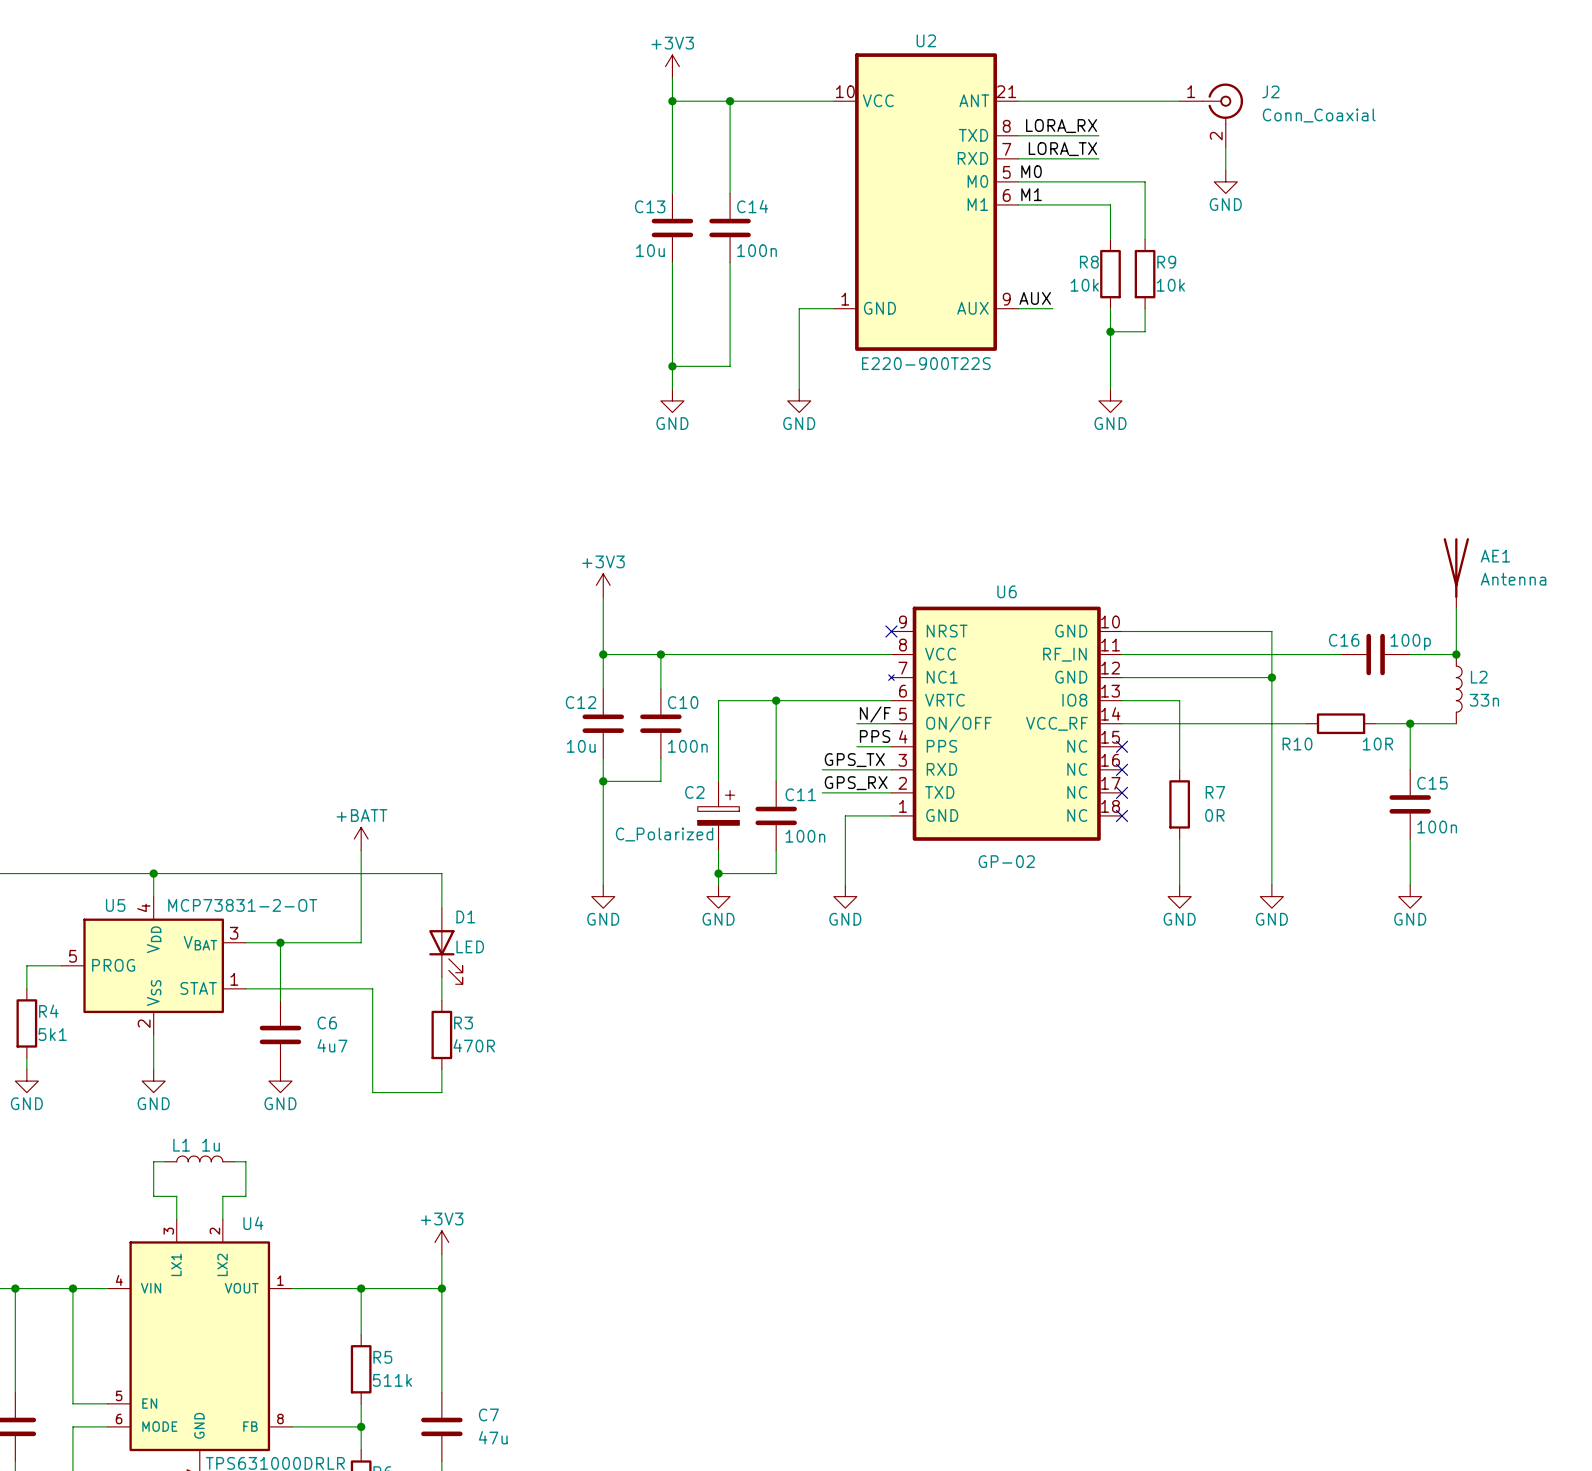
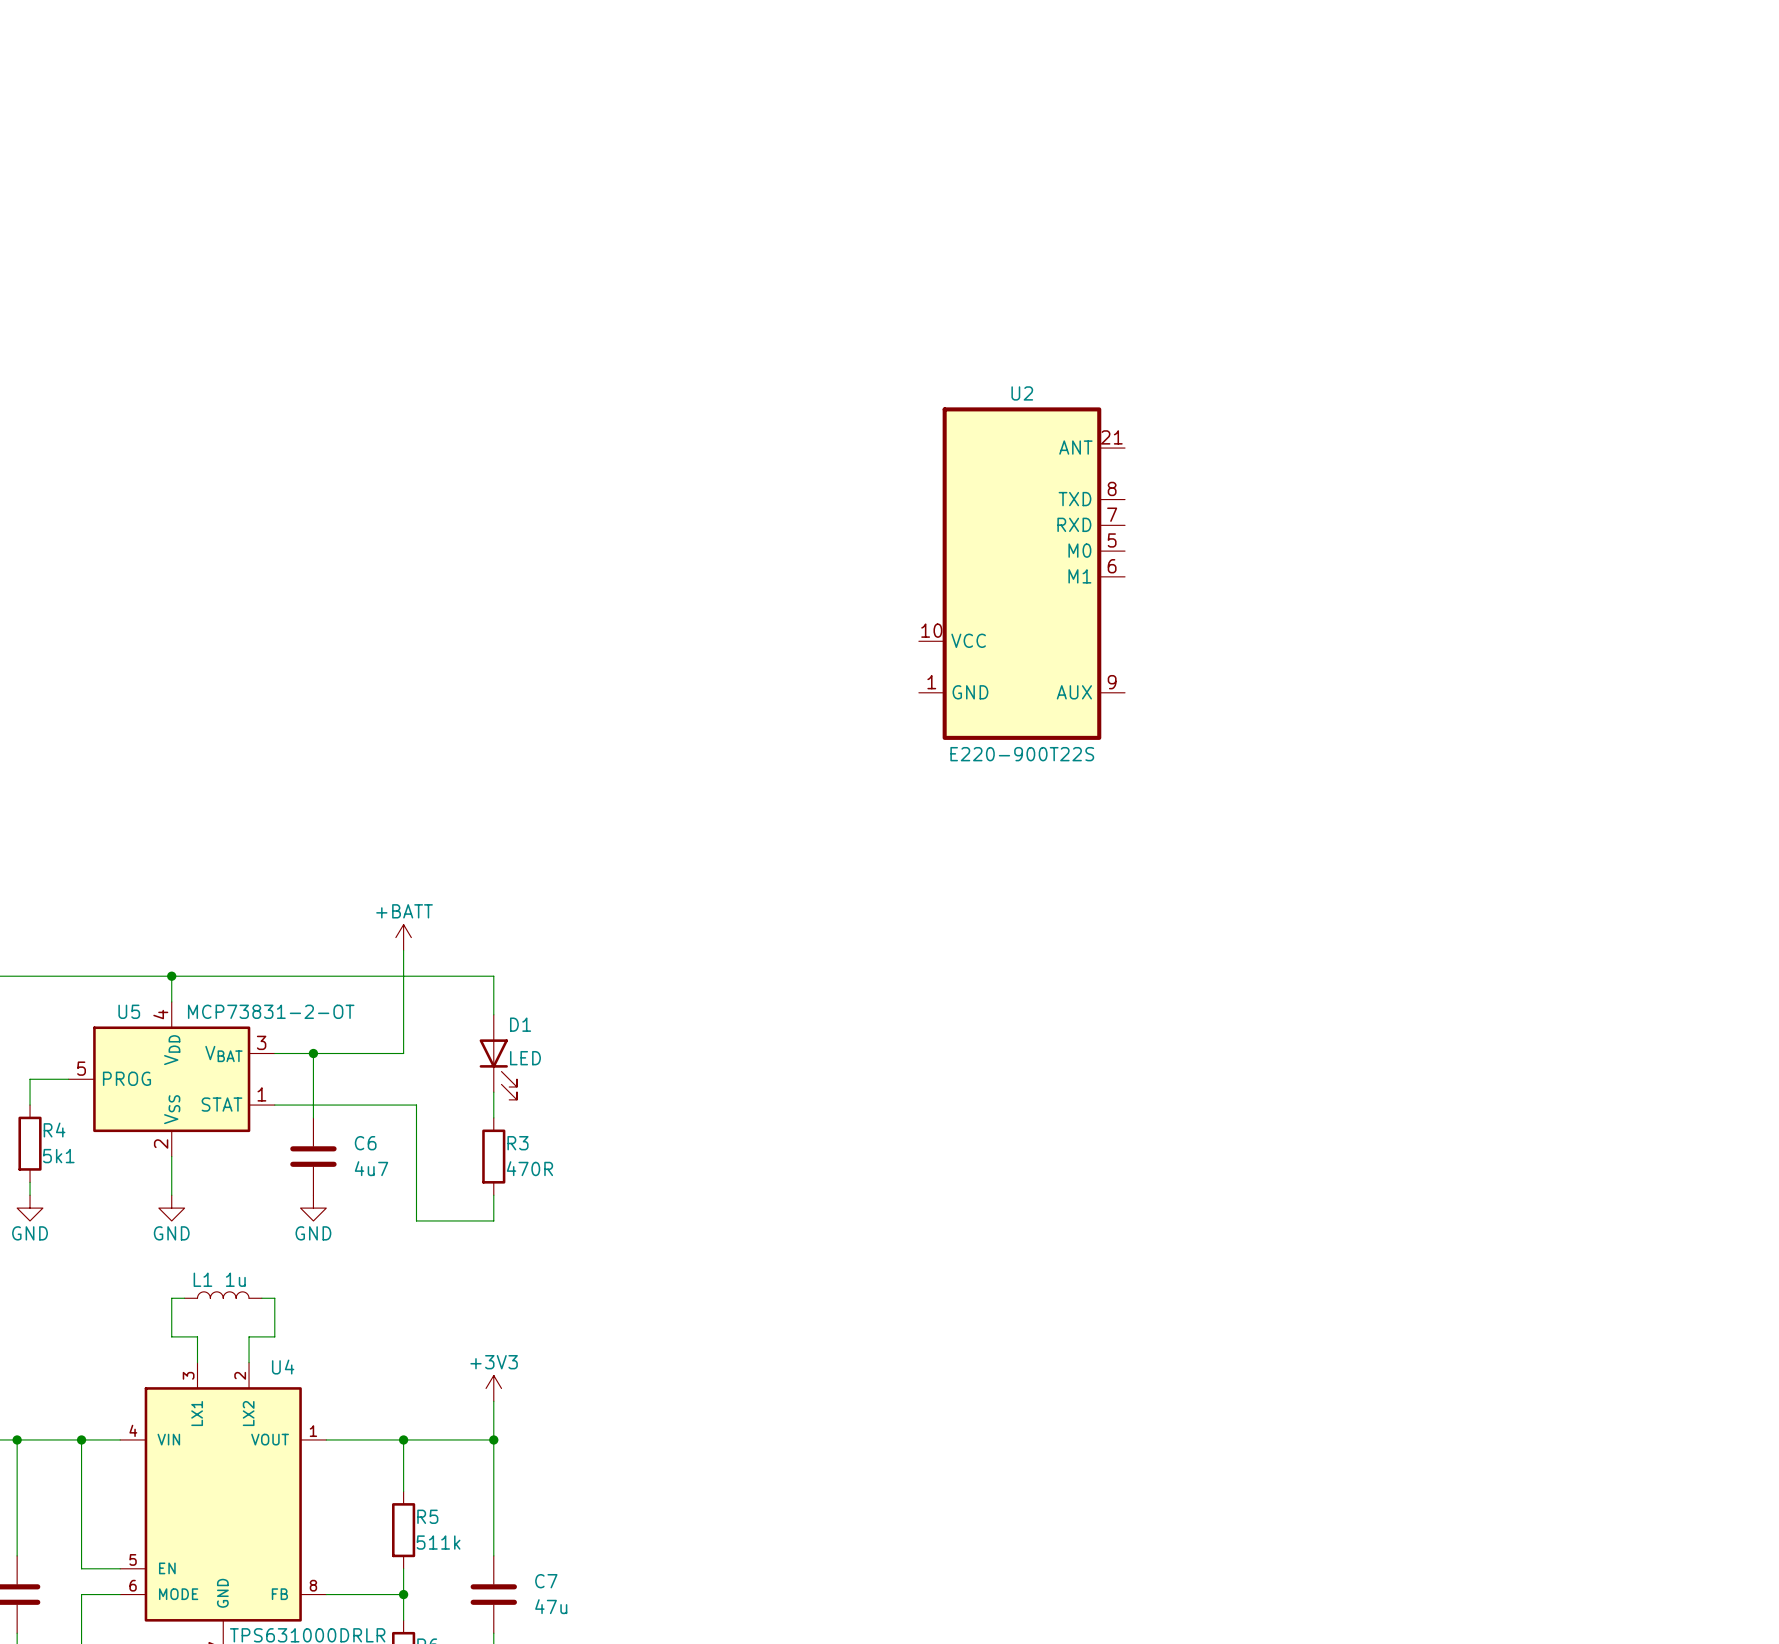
U2 symbol: [833, 53, 1019, 351] -> [918, 407, 1126, 740]
power symbol: +3V3 (672, 66) -> none
wire: (672, 78) (672, 193) -> none
wire: (672, 101) (833, 101) -> none
junction: (672, 101) -> none
wire: (730, 101) (730, 193) -> none
junction: (730, 101) -> none
wire: (1018, 101) (1179, 101) -> none
J2: Conn_Coaxial (1211, 115) -> none
label: LORA_RX (1061, 126) -> none
wire: (1018, 135) (1098, 135) -> none
wire: (1225, 147) (1225, 170) -> none
label: LORA_TX (1062, 149) -> none
wire: (1018, 158) (1098, 158) -> none
label: M0 (1031, 171) -> none
wire: (1018, 181) (1145, 181) (1145, 239) -> none
power symbol: GND (1225, 181) -> none
label: M1 (1031, 194) -> none
wire: (1018, 204) (1110, 204) (1110, 239) -> none
C13: 10u (672, 228) -> none
C14: 100n (730, 228) -> none
wire: (672, 262) (672, 389) -> none
wire: (730, 262) (730, 366) (672, 366) -> none
R8: 10k (1110, 274) -> none
R9: 10k (1145, 274) -> none
label: AUX (1035, 298) -> none
wire: (833, 308) (799, 308) (799, 389) -> none
wire: (1018, 308) (1052, 308) -> none
wire: (1110, 308) (1110, 389) -> none
wire: (1145, 308) (1145, 331) (1110, 331) -> none
junction: (1110, 331) -> none
junction: (672, 366) -> none
power symbol: GND (672, 400) -> none
power symbol: GND (799, 400) -> none
power symbol: GND (1110, 400) -> none
AE1: Antenna (1456, 573) -> none
power symbol: +3V3 (603, 585) -> none
wire: (603, 596) (603, 689) -> none
wire: (1456, 608) (1456, 654) (1410, 654) -> none
no-connect mark: (891, 631) -> none
wire: (1122, 631) (1271, 631) (1271, 885) -> none
wire: (603, 654) (891, 654) -> none
junction: (603, 654) -> none
wire: (660, 654) (660, 689) -> none
junction: (660, 654) -> none
wire: (1122, 654) (1341, 654) -> none
C16: 100p (1375, 654) -> none
junction: (1456, 654) -> none
wire: (1122, 677) (1271, 677) -> none
junction: (1271, 677) -> none
L2: 33n (1459, 689) -> none
wire: (776, 700) (776, 781) -> none
junction: (776, 700) -> none
wire: (891, 700) (718, 700) (718, 781) -> none
wire: (1122, 700) (1179, 700) (1179, 769) -> none
label: N/F (875, 714) -> none
C12: 10u (603, 723) -> none
C10: 100n (660, 723) -> none
wire: (856, 723) (891, 723) -> none
U6: GP-02 (1005, 723) -> none
wire: (1122, 723) (1306, 723) -> none
R10: 10R (1341, 723) -> none
wire: (1375, 723) (1456, 723) -> none
wire: (1410, 723) (1410, 769) -> none
junction: (1410, 723) -> none
label: PPS (875, 736) -> none
wire: (856, 746) (891, 746) -> none
no-connect mark: (1122, 746) -> none
wire: (603, 758) (603, 885) -> none
wire: (660, 758) (660, 781) (603, 781) -> none
label: GPS_TX (854, 760) -> none
wire: (822, 769) (891, 769) -> none
no-connect mark: (1122, 769) -> none
junction: (603, 781) -> none
label: GPS_RX (856, 783) -> none
wire: (822, 792) (891, 792) -> none
no-connect mark: (1122, 792) -> none
R7: 0R (1179, 804) -> none
C15: 100n (1410, 804) -> none
C2: C_Polarized (718, 815) -> none
C11: 100n (776, 815) -> none
wire: (891, 815) (845, 815) (845, 885) -> none
no-connect mark: (1122, 815) -> none
wire: (1179, 839) (1179, 885) -> none
wire: (1410, 839) (1410, 885) -> none
wire: (718, 850) (718, 885) -> none
wire: (776, 850) (776, 873) (718, 873) -> none
junction: (718, 873) -> none
power symbol: GND (603, 896) -> none
power symbol: GND (718, 896) -> none
power symbol: GND (845, 896) -> none
power symbol: GND (1179, 896) -> none
power symbol: GND (1271, 896) -> none
power symbol: GND (1410, 896) -> none

